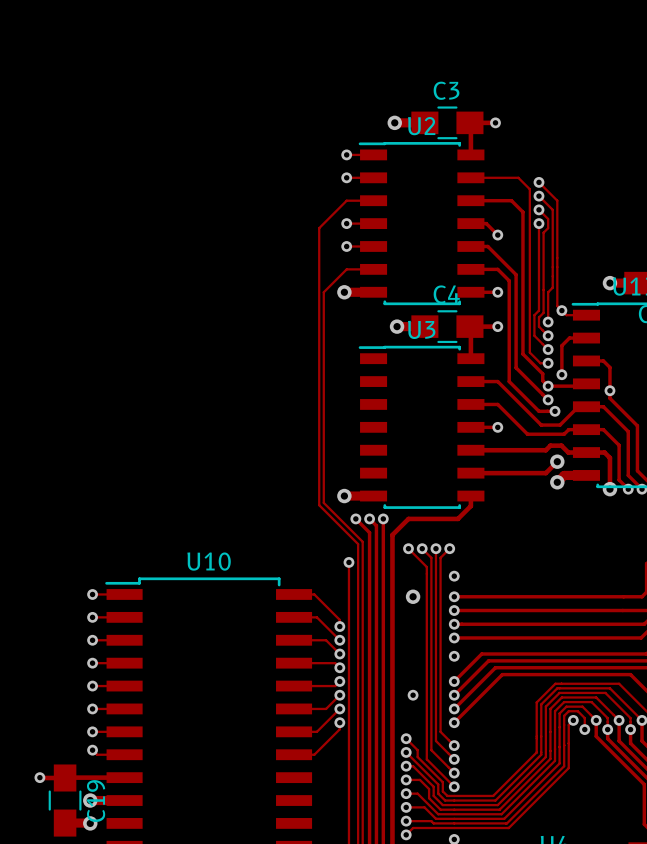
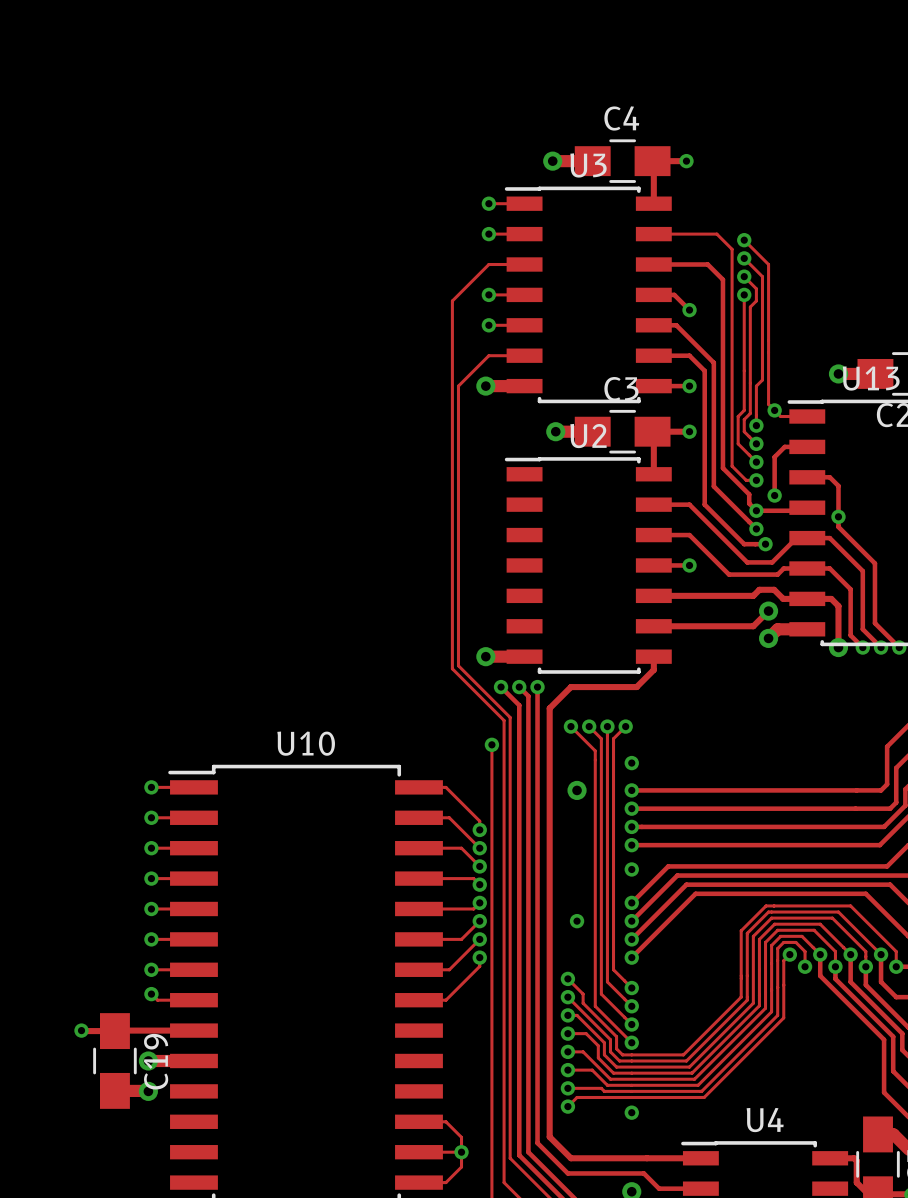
C3 name: C3 (446, 90) -> C4 (621, 118)
U2 name: U2 (421, 126) -> U3 (588, 165)
C4 name: C4 (446, 294) -> C3 (621, 389)
U3 name: U3 (421, 329) -> U2 (588, 436)

